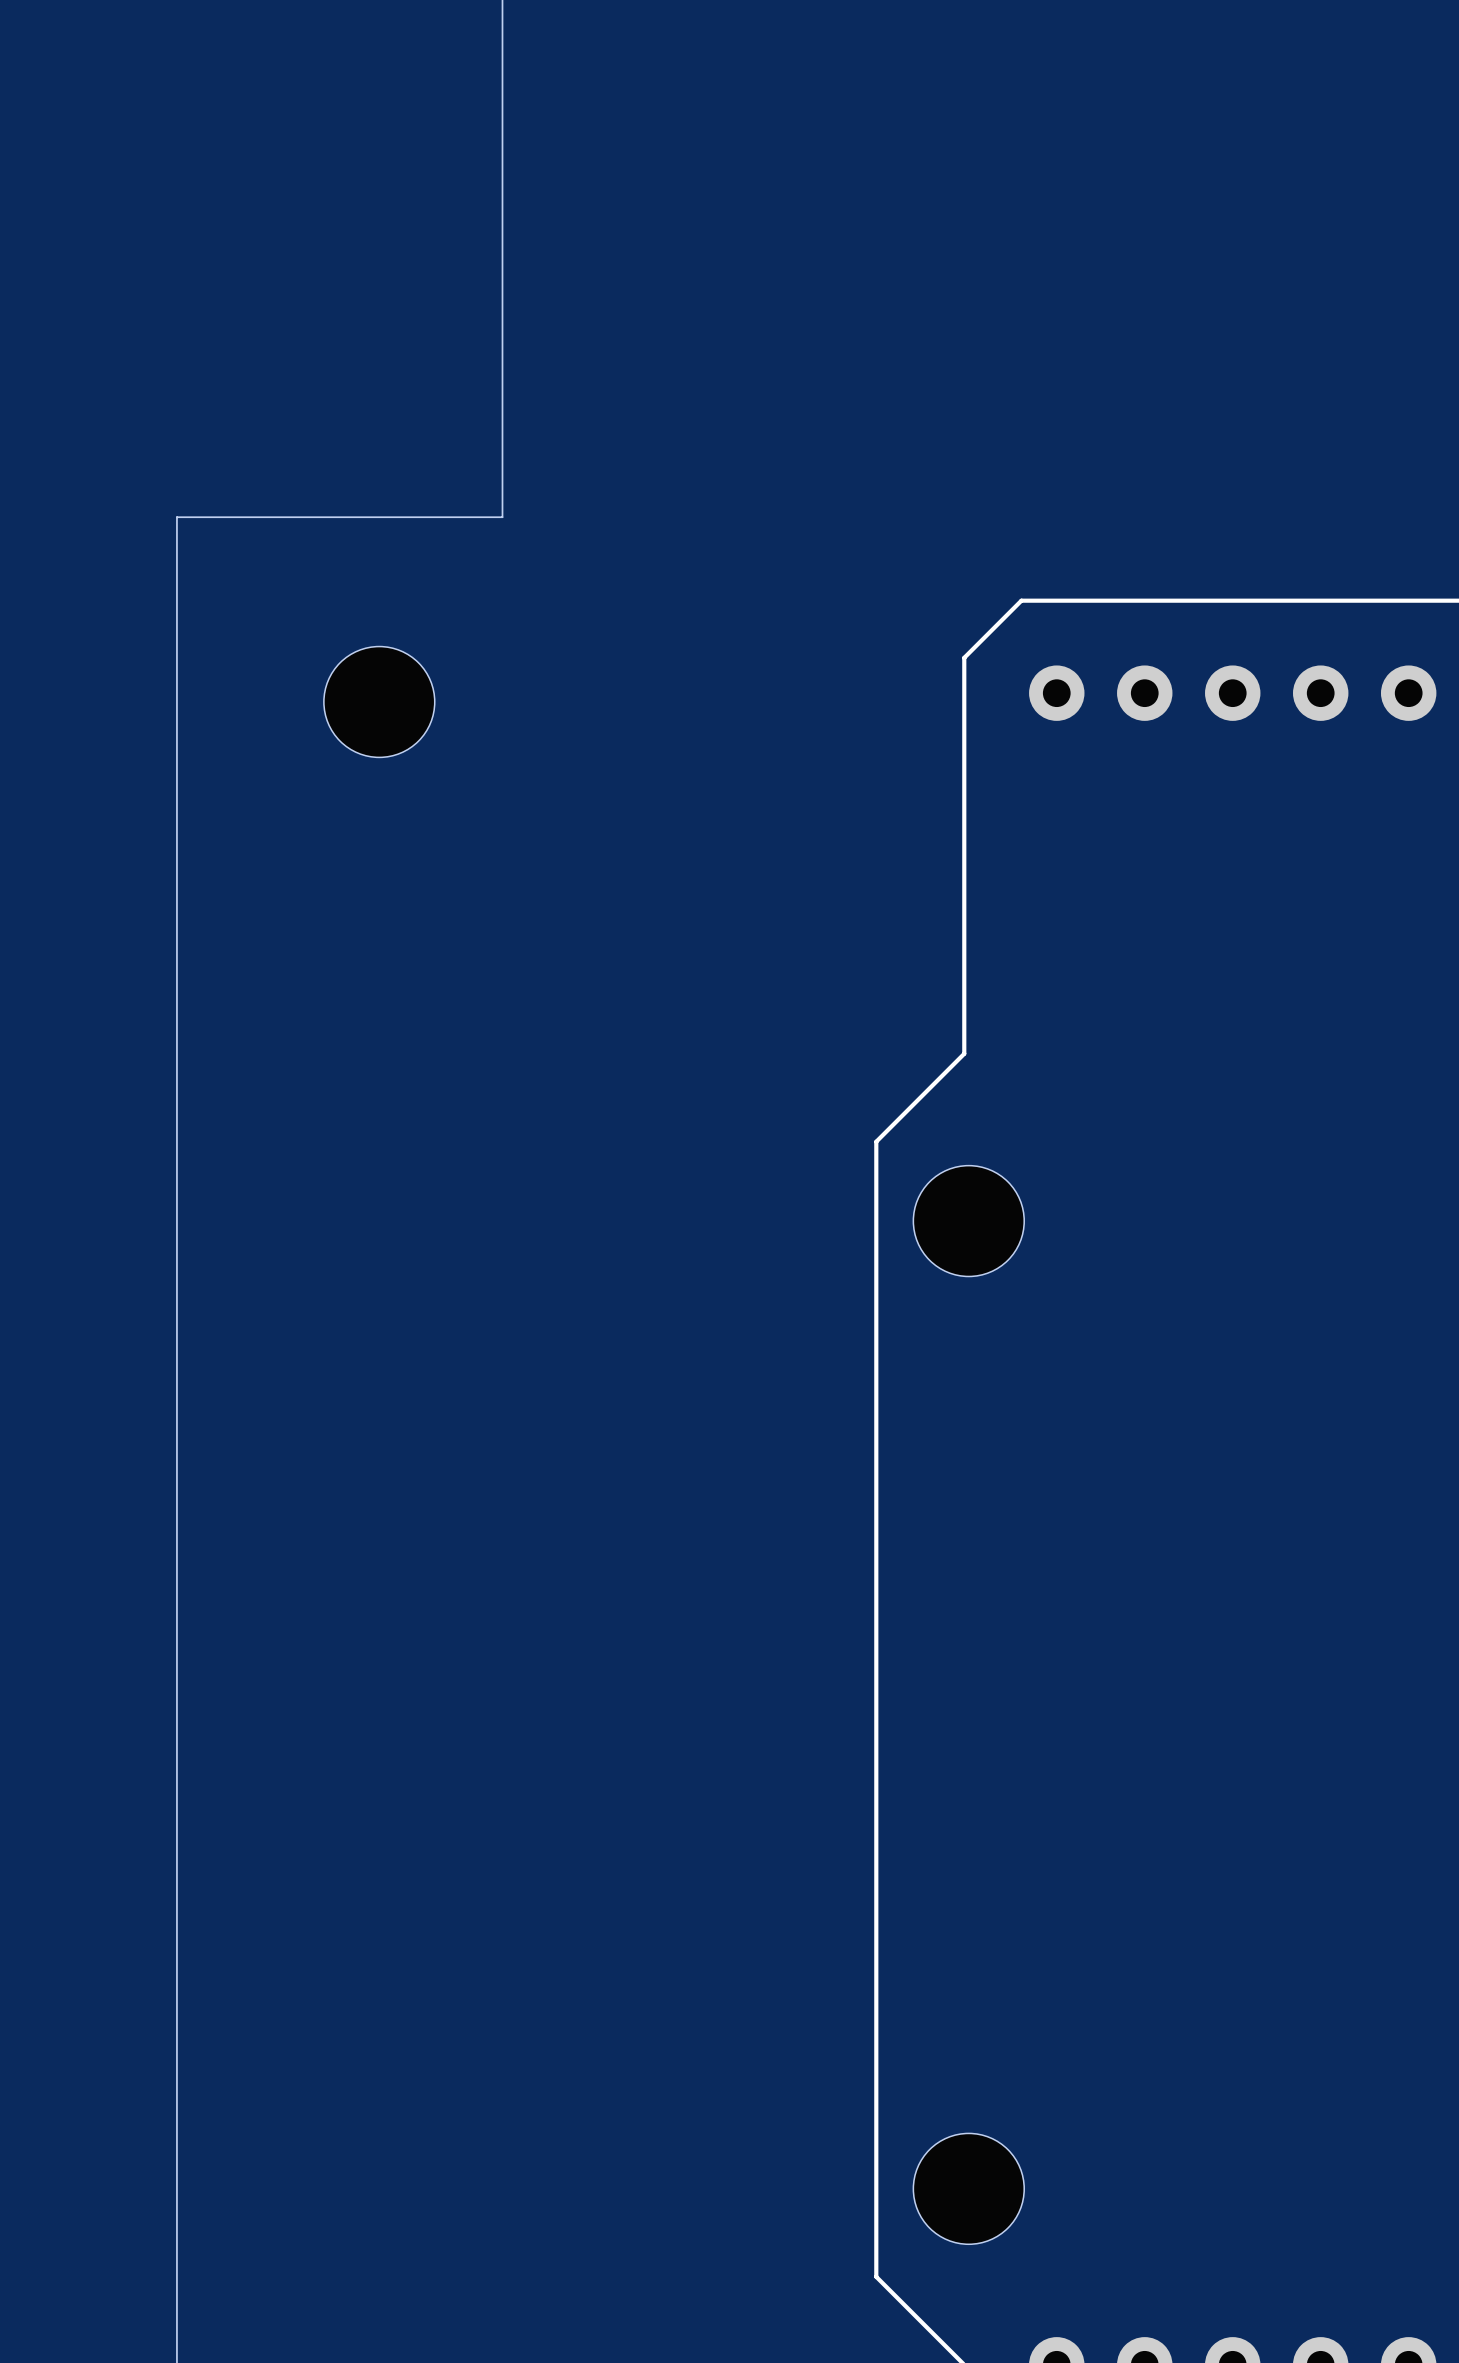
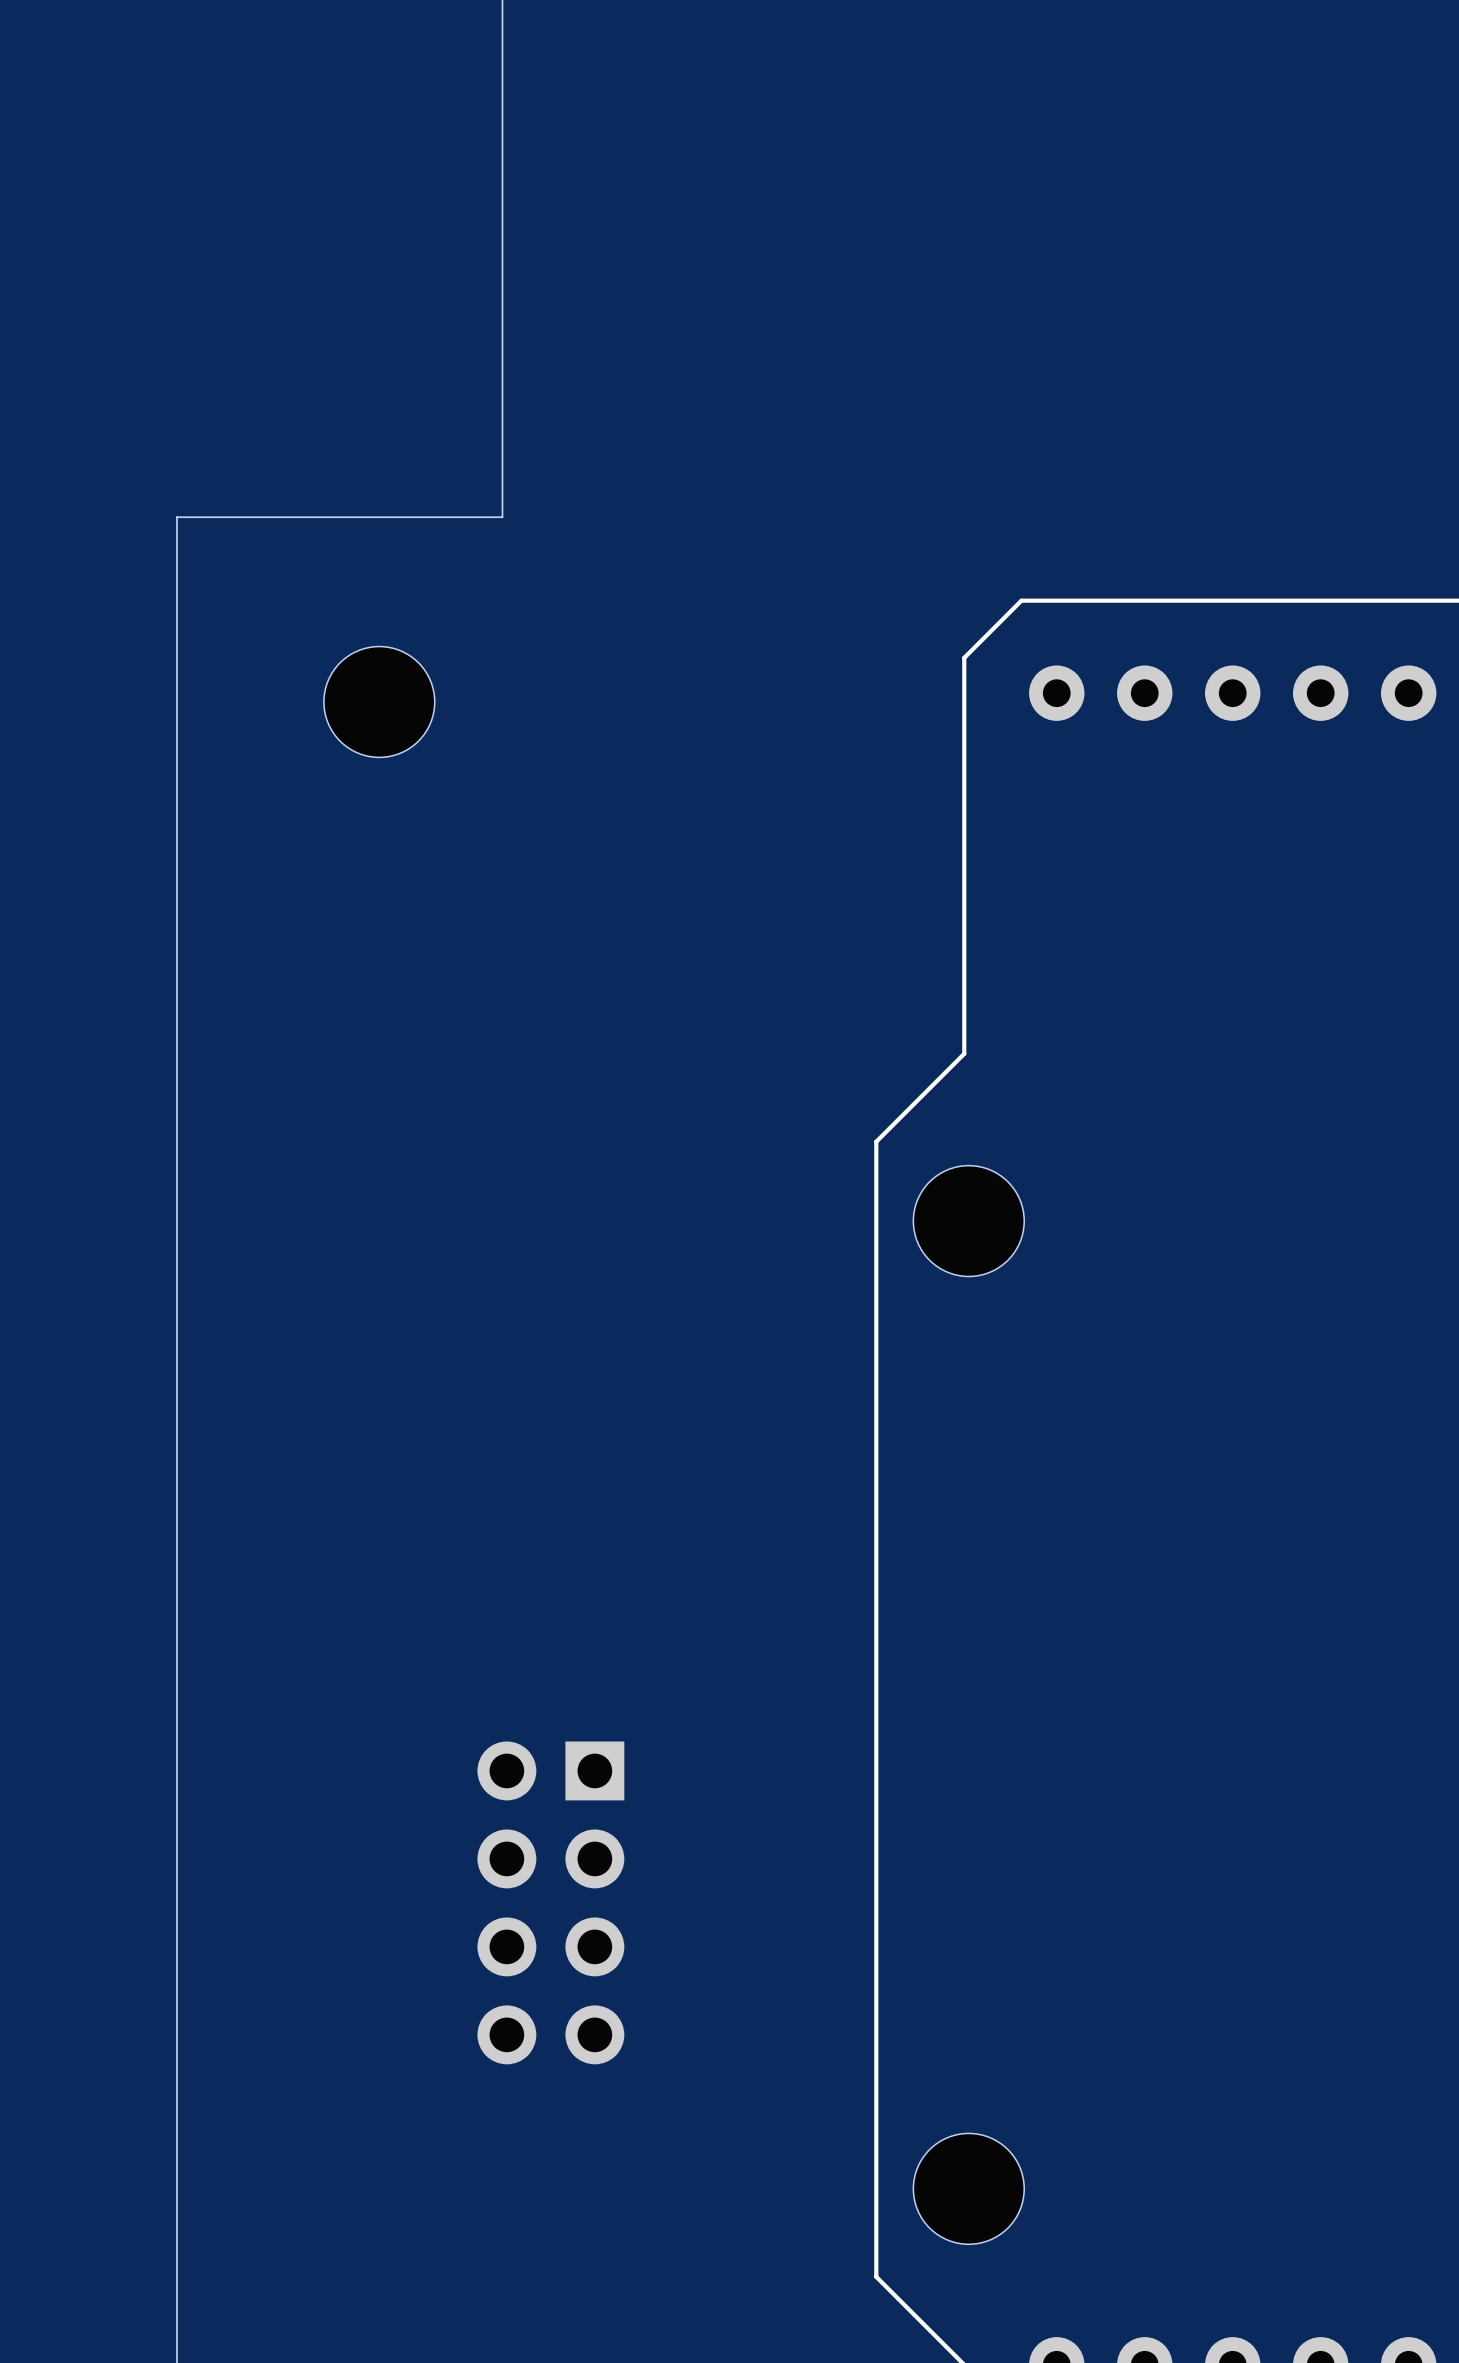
part: none -> (550, 1902)

